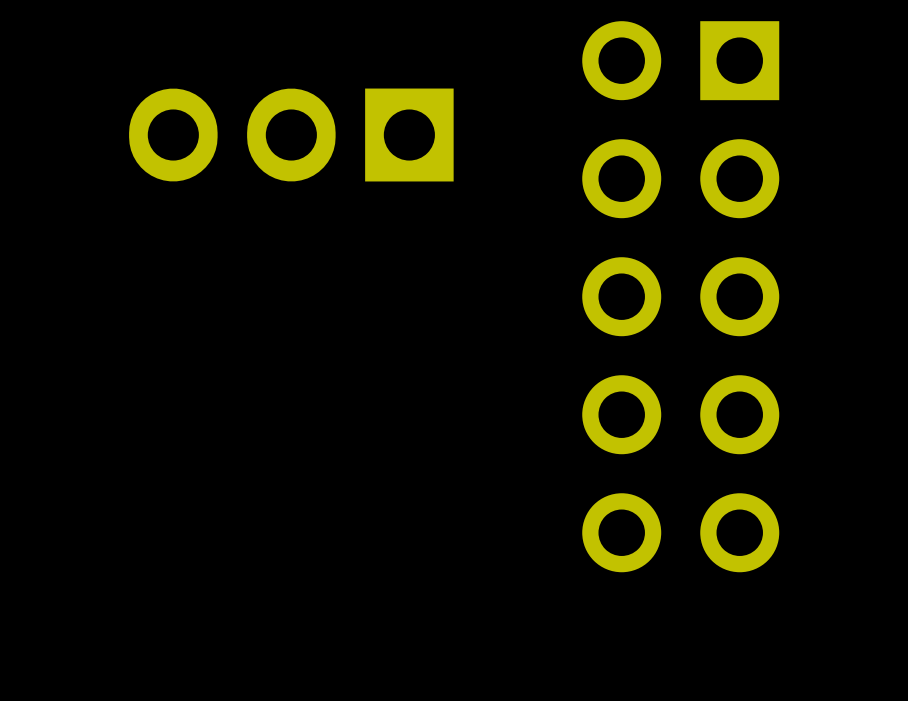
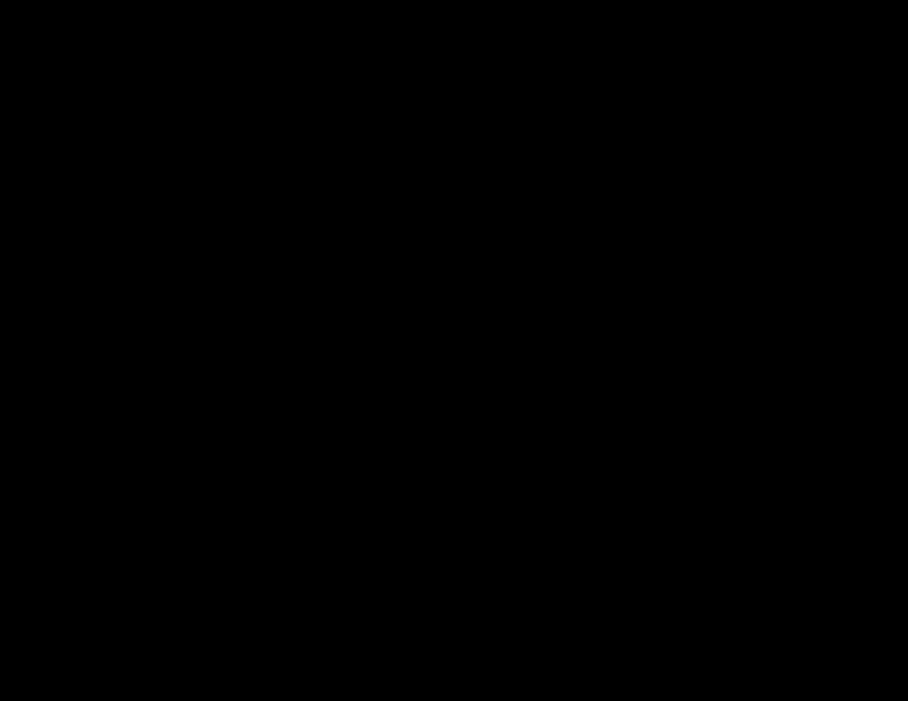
part: (291, 135) -> none
part: (680, 296) -> none

